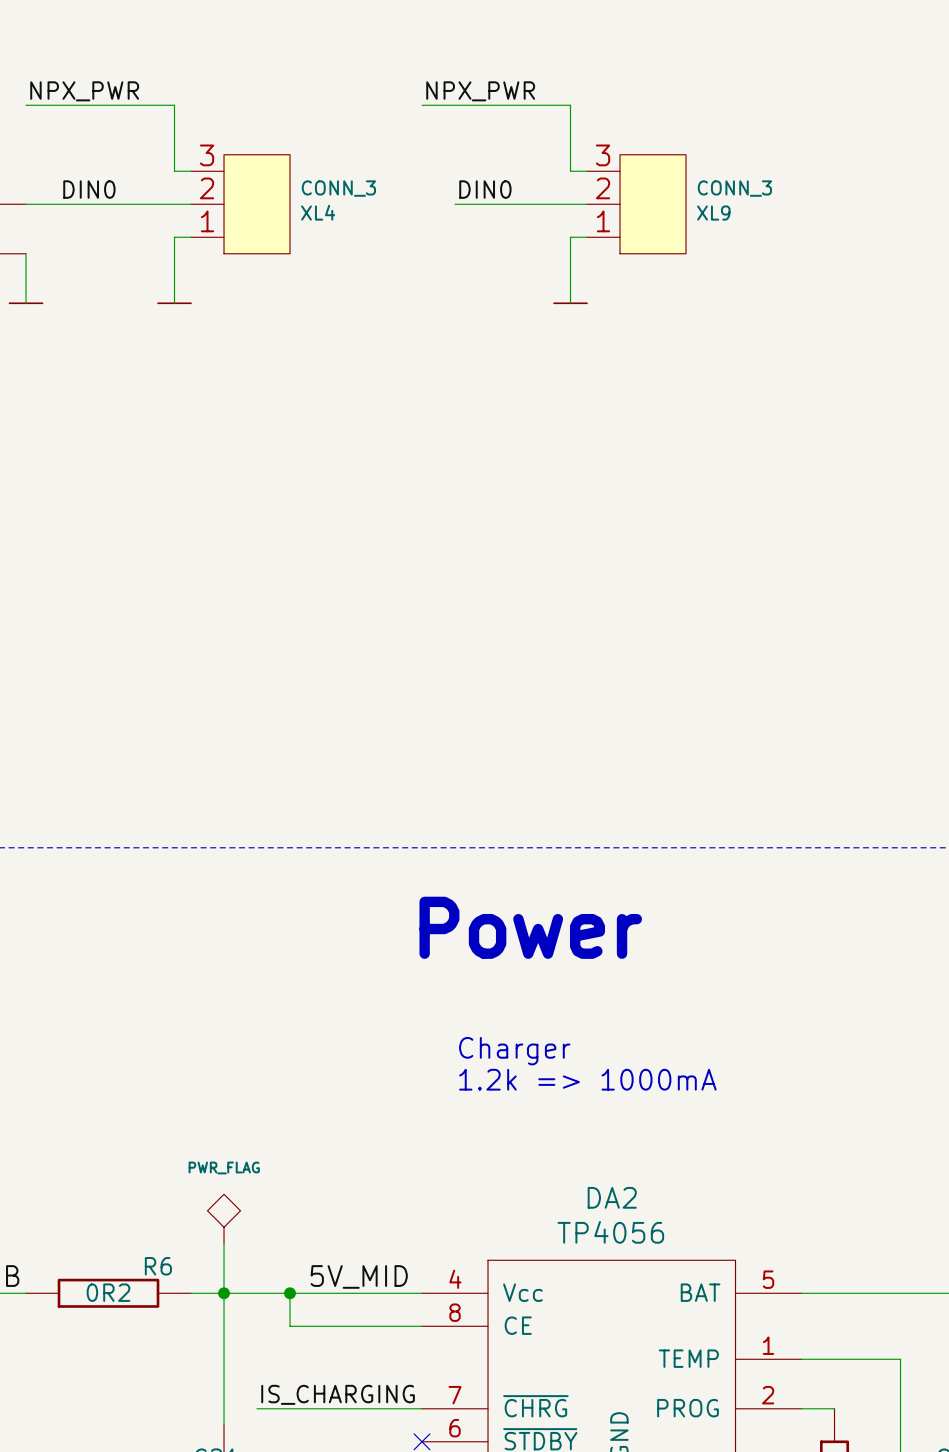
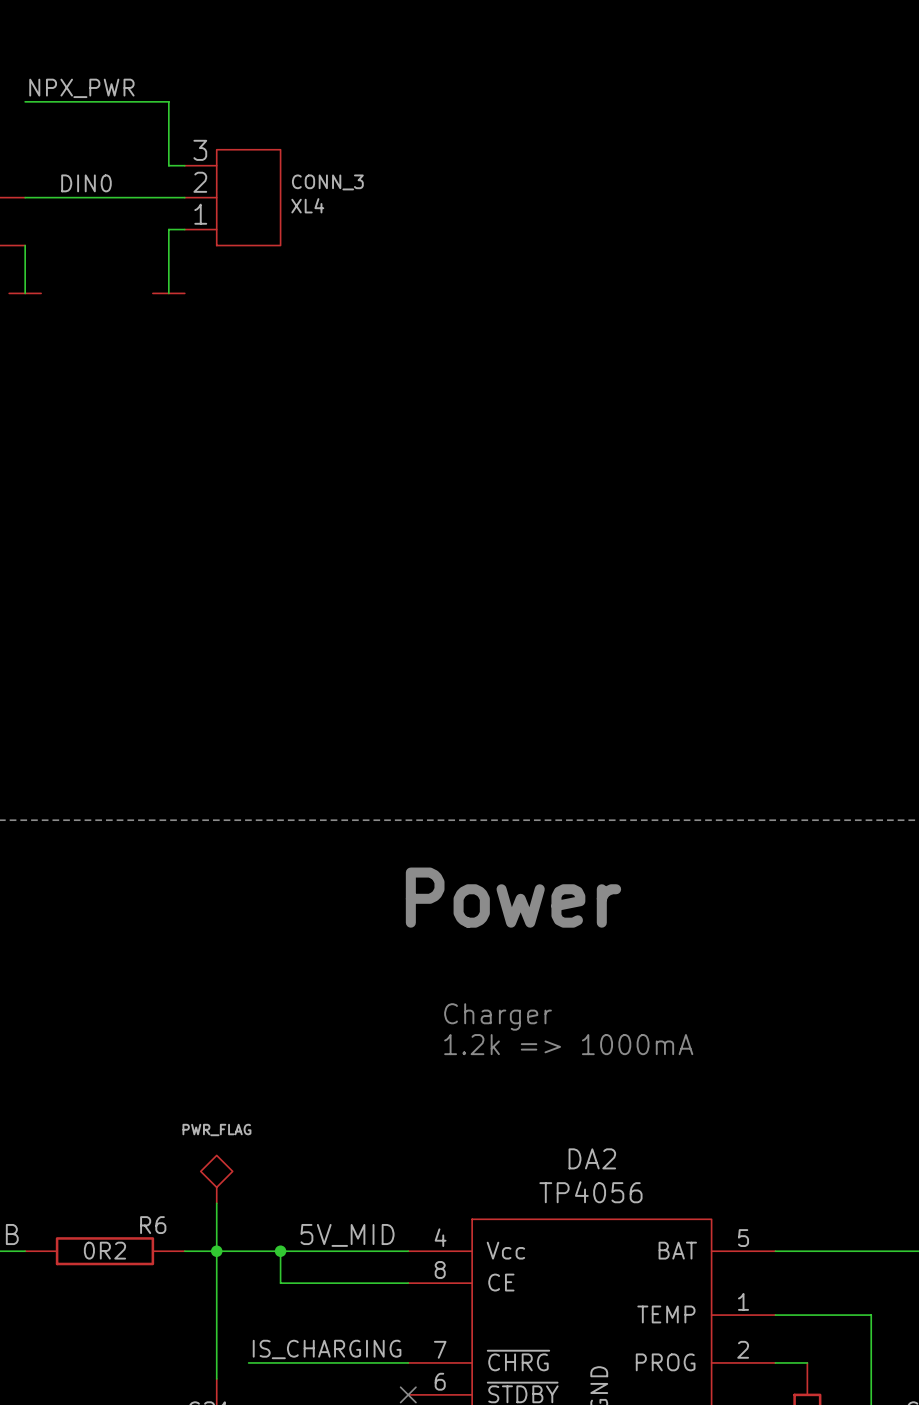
label: NPX_PWR (480, 91) -> none
wire: (422, 105) (570, 105) (570, 171) (587, 171) -> none
label: DIN0 (485, 189) -> none
wire: (455, 204) (587, 204) -> none
XL9: CONN_3 (636, 204) -> none
wire: (587, 237) (570, 237) (570, 303) -> none
power symbol: (570, 303) -> none

